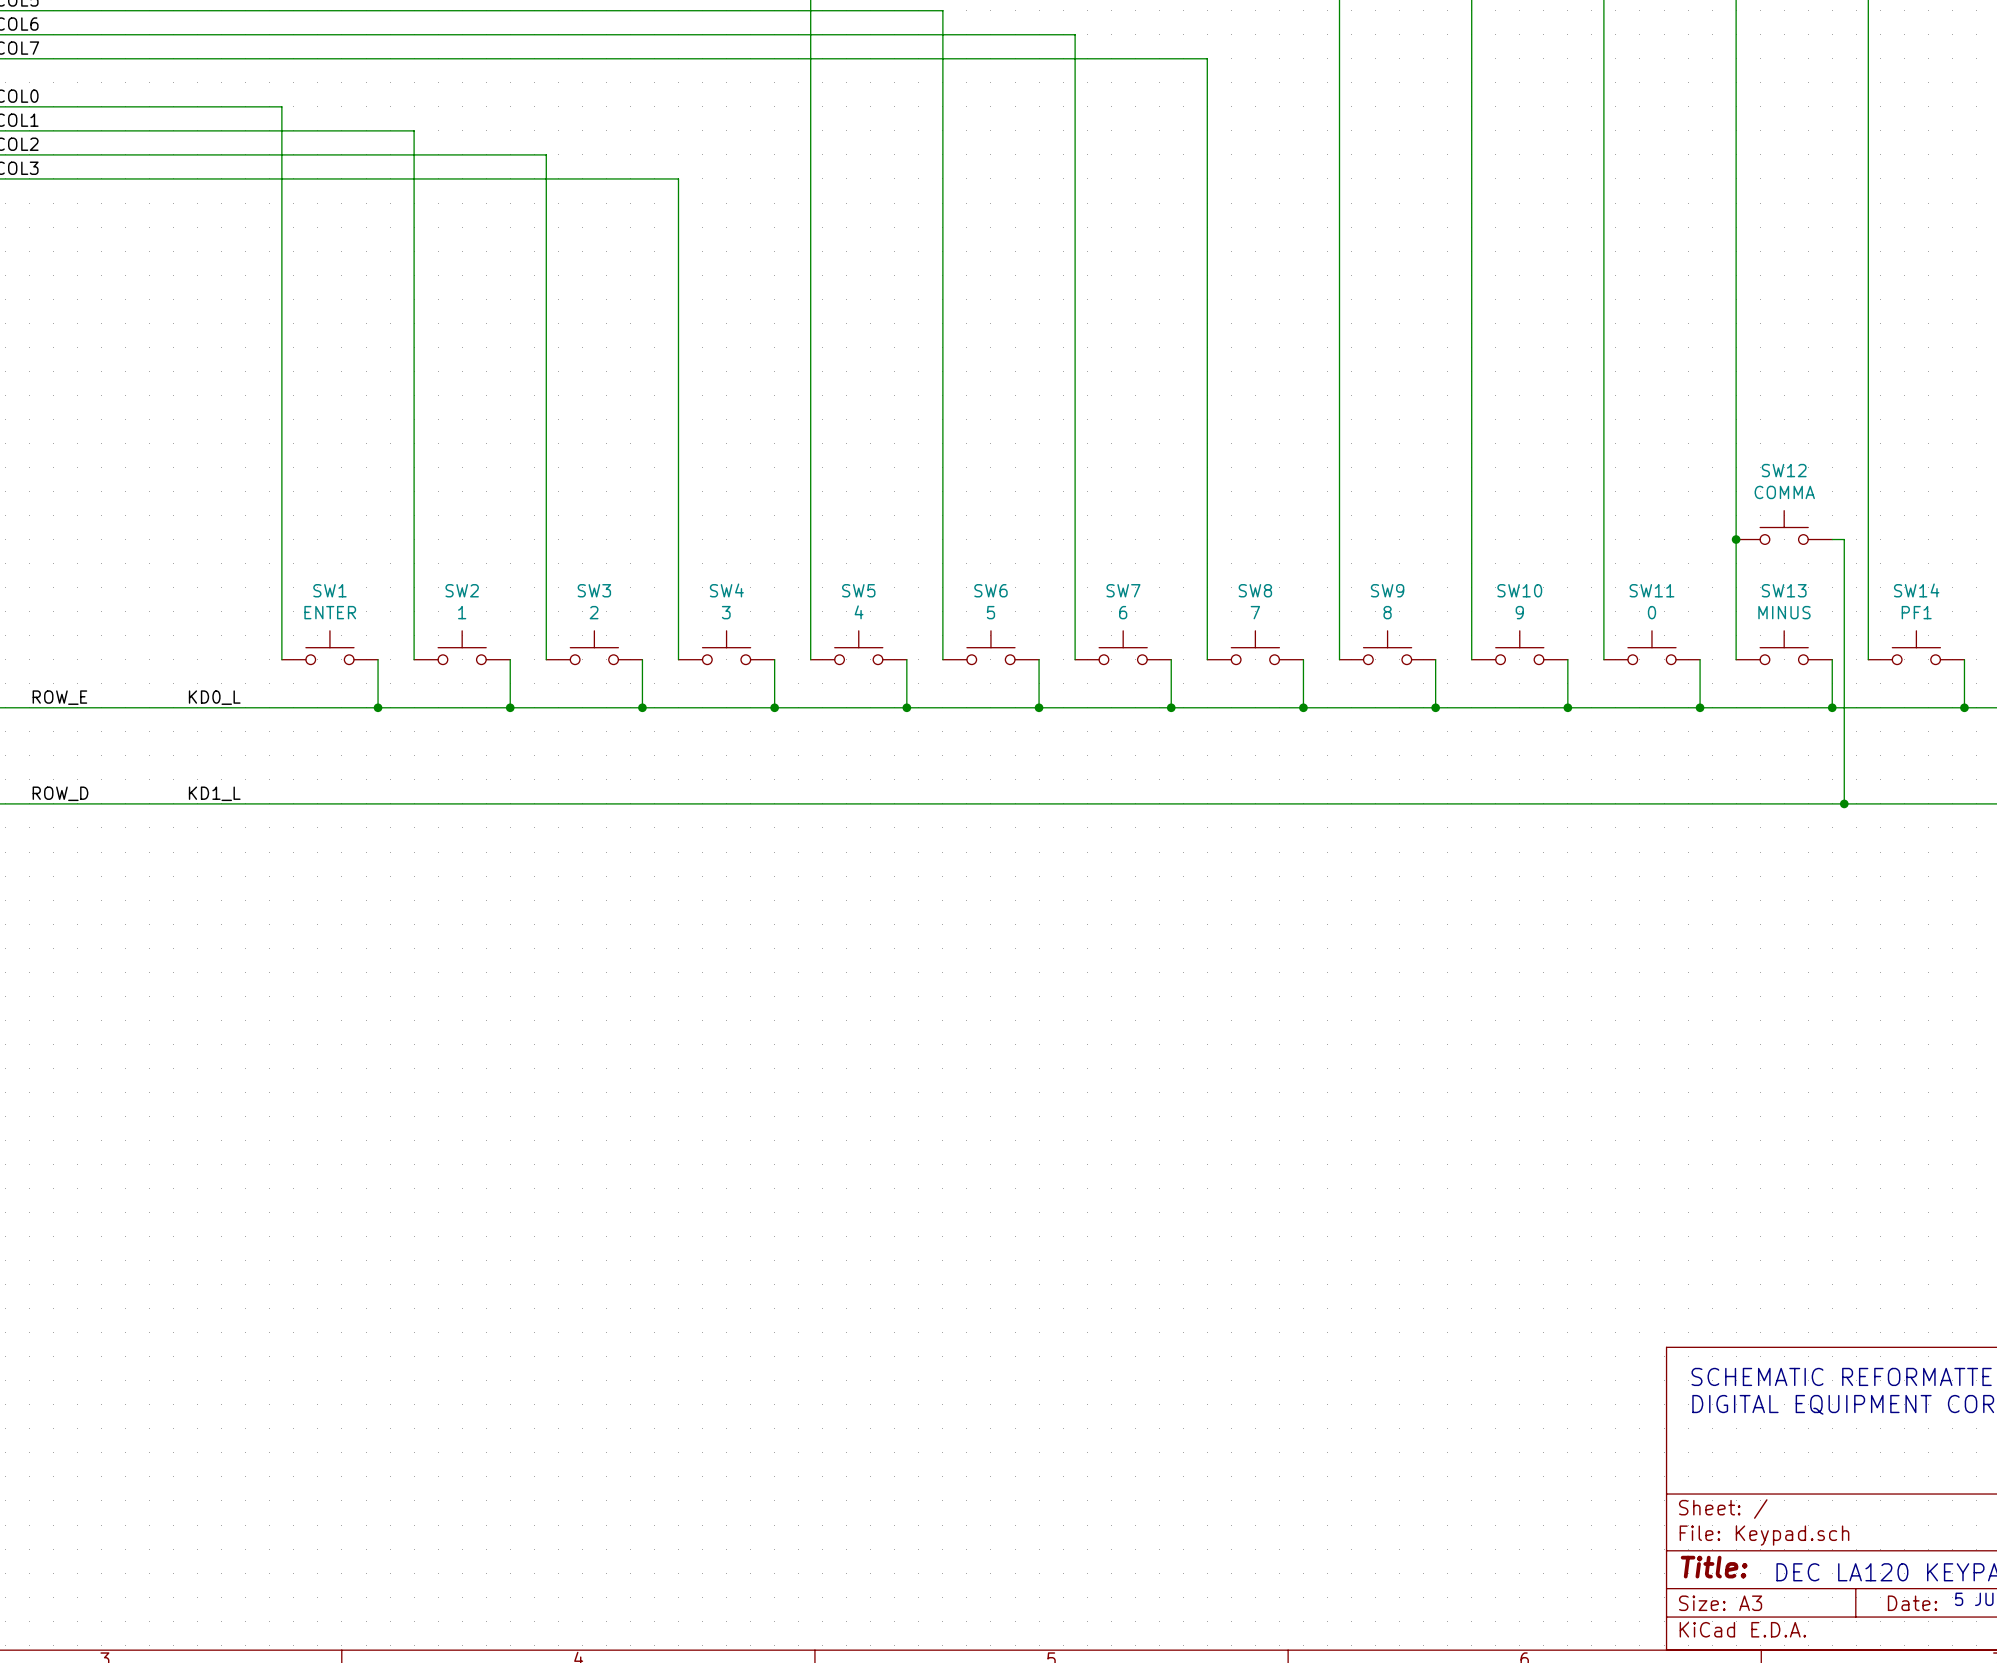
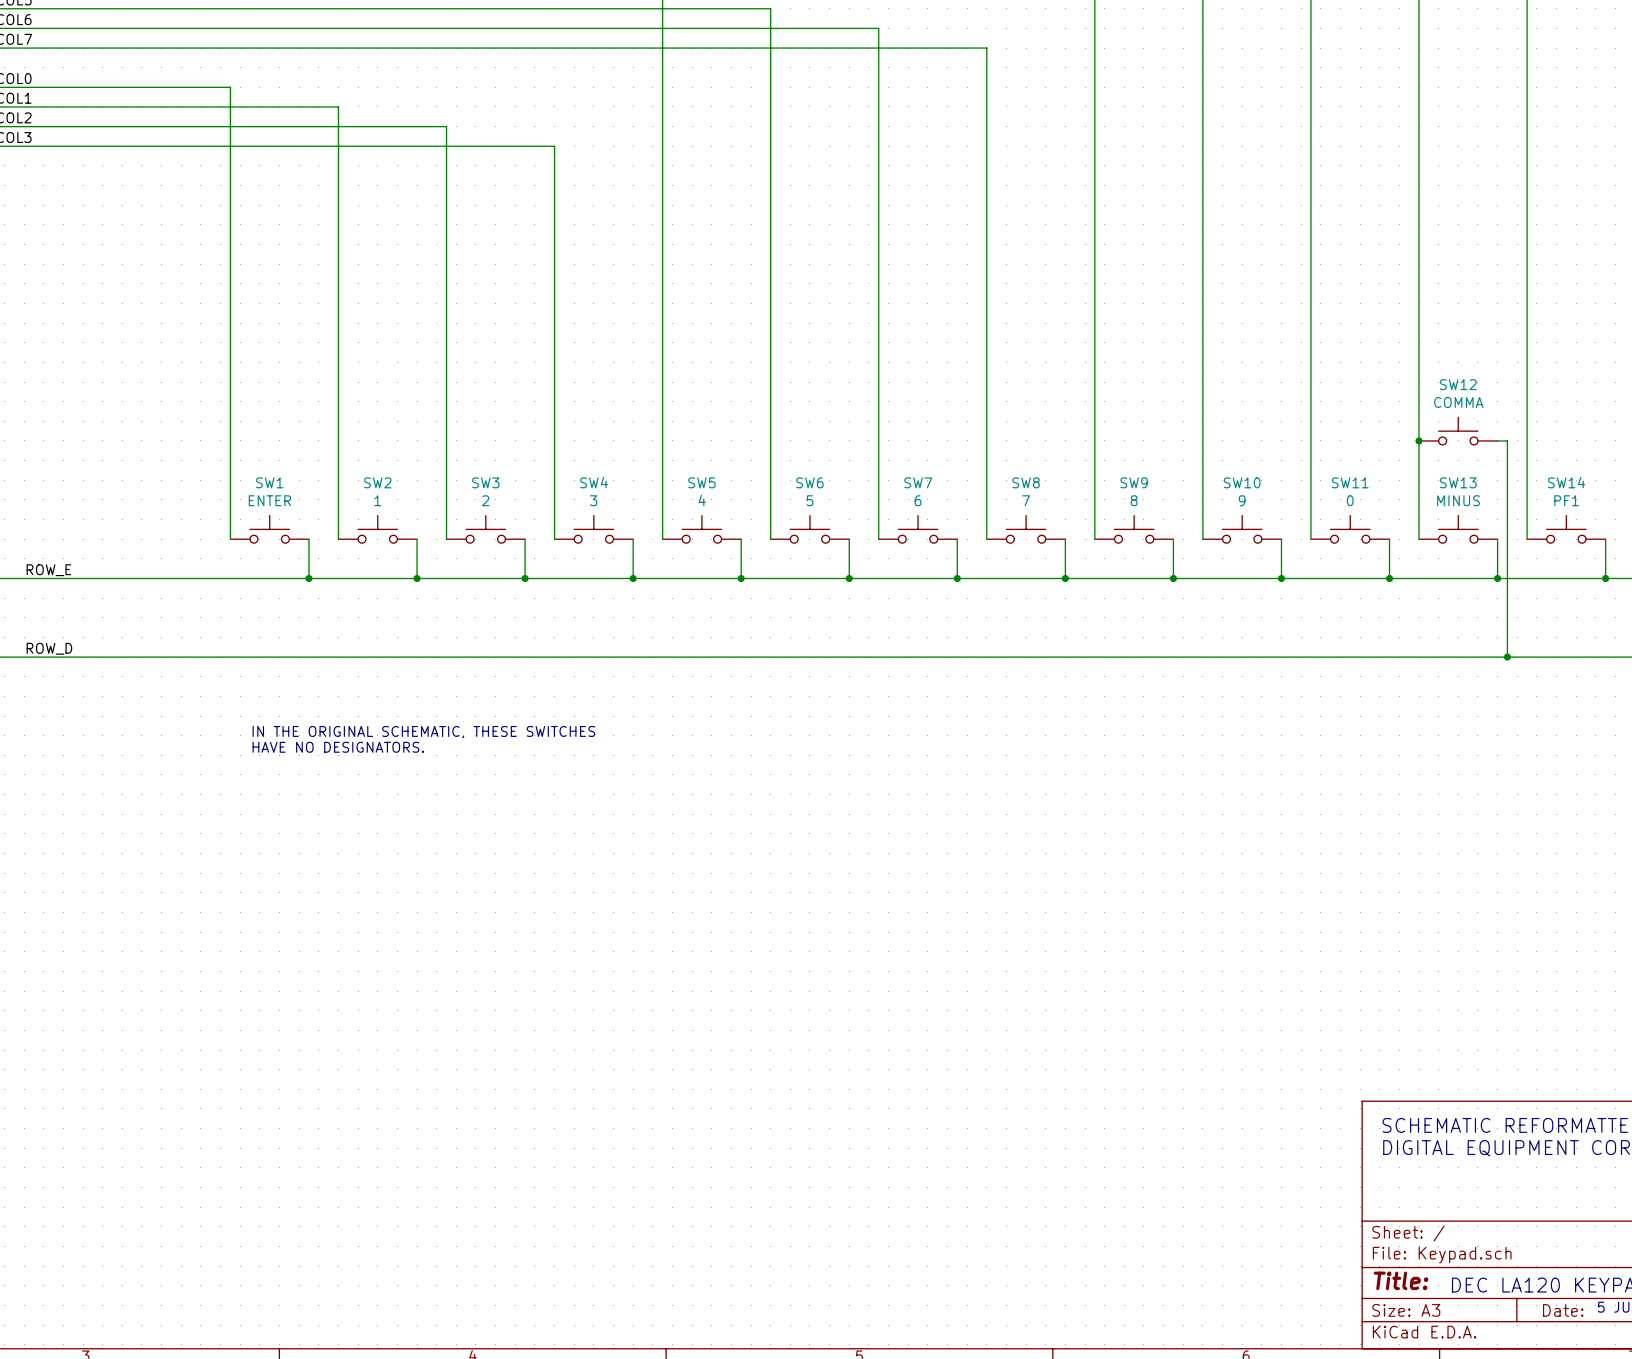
label: KD0_L (214, 697) -> none
label: KD1_L (214, 793) -> none
text: none -> IN THE ORIGINAL SCHEMATIC, THESE SWITCHES (423, 732)
text: none -> HAVE NO DESIGNATORS. (338, 747)

